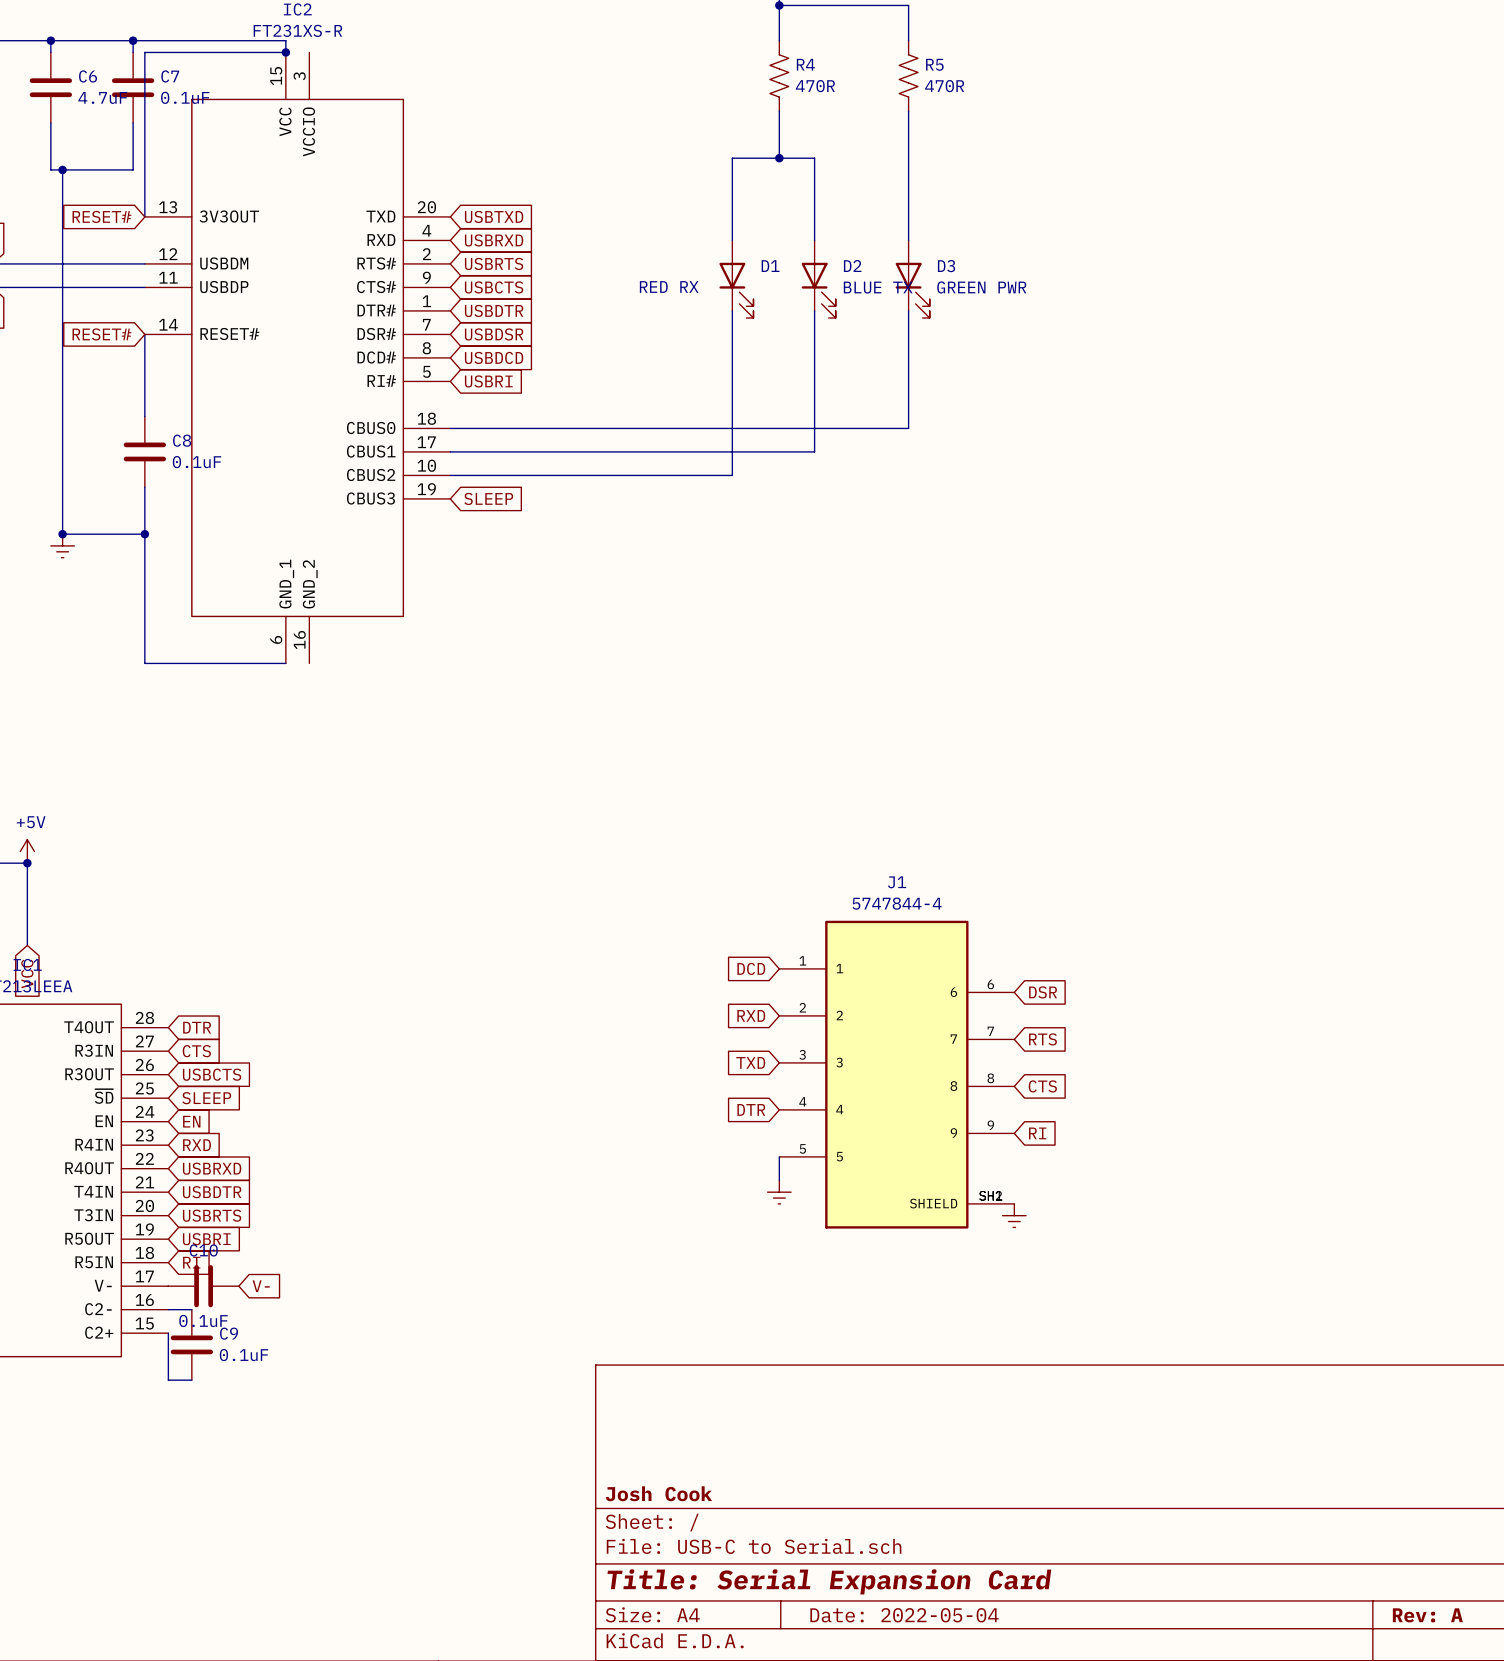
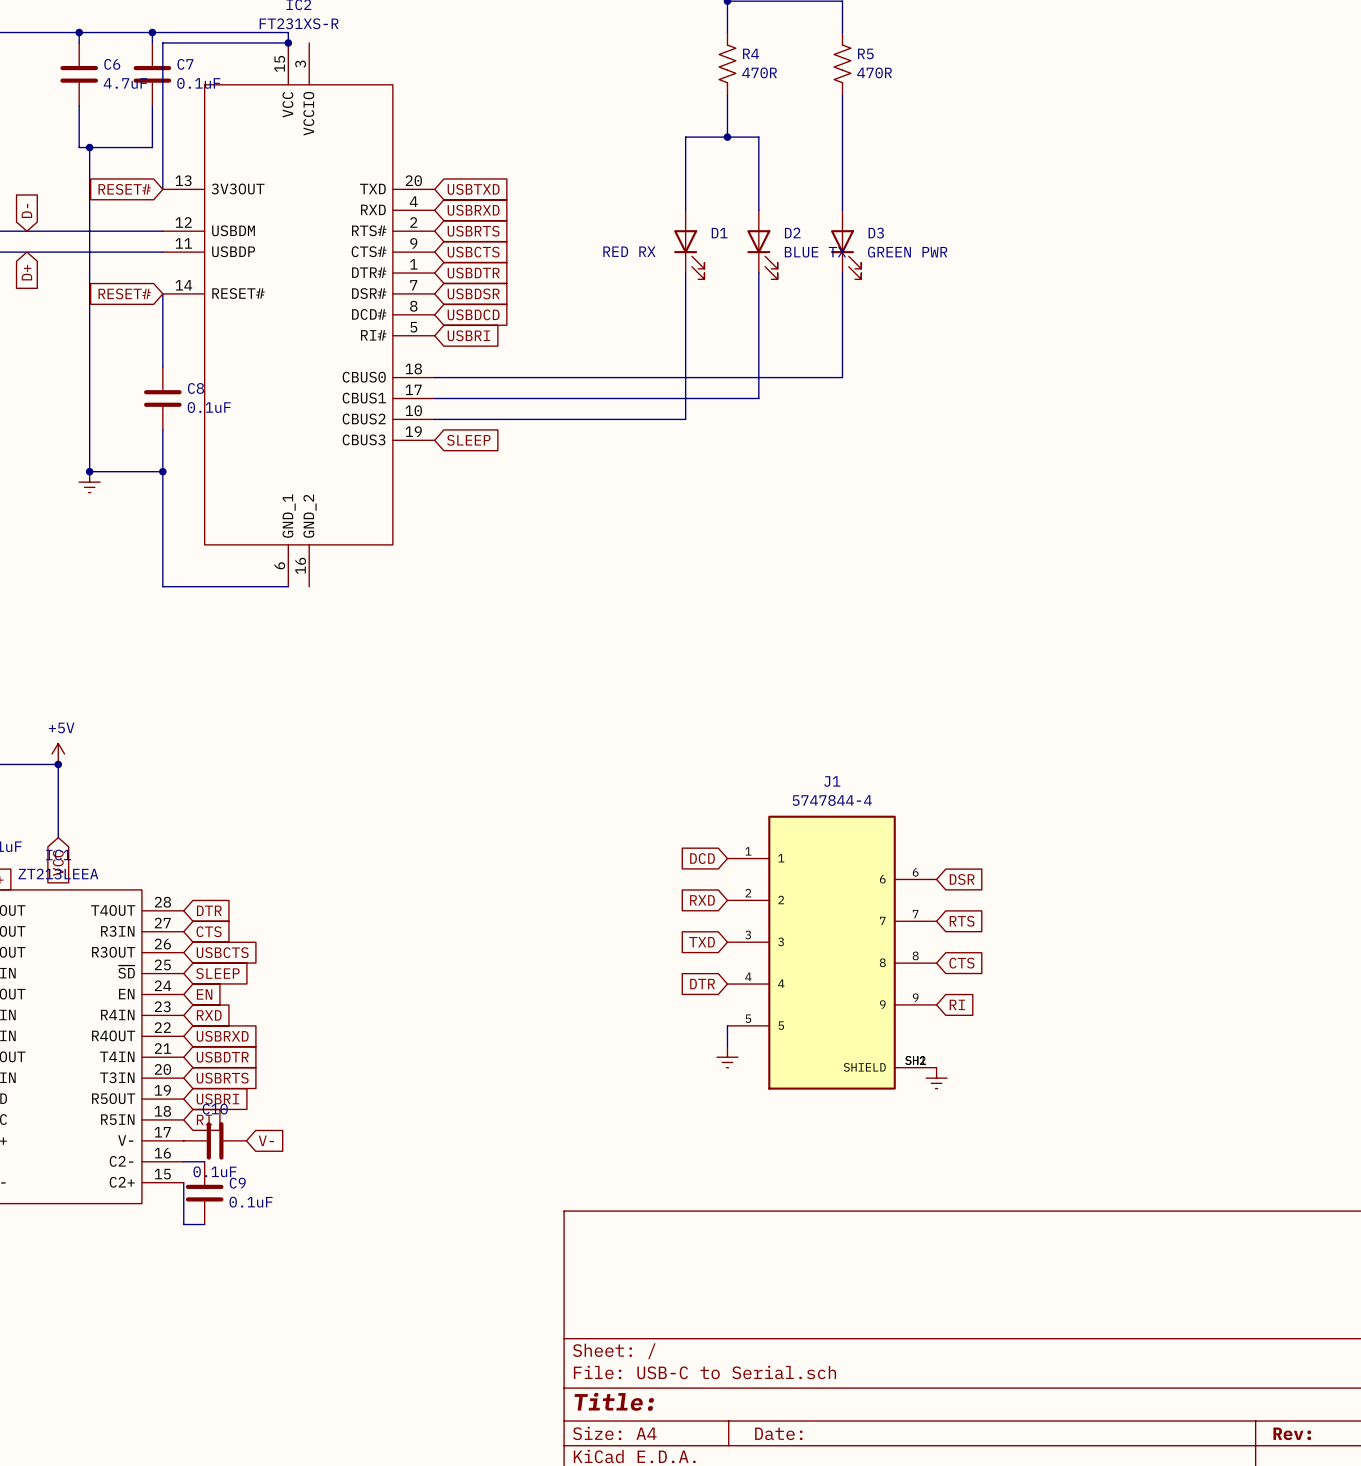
title block: Josh Cook (658, 1493) -> none
title block: Title: Serial Expansion Card (829, 1581) -> Title: (614, 1401)
title block: Date: 2022-05-04 (904, 1615) -> Date: (778, 1433)
title block: Rev: A (1427, 1615) -> Rev: (1292, 1433)

